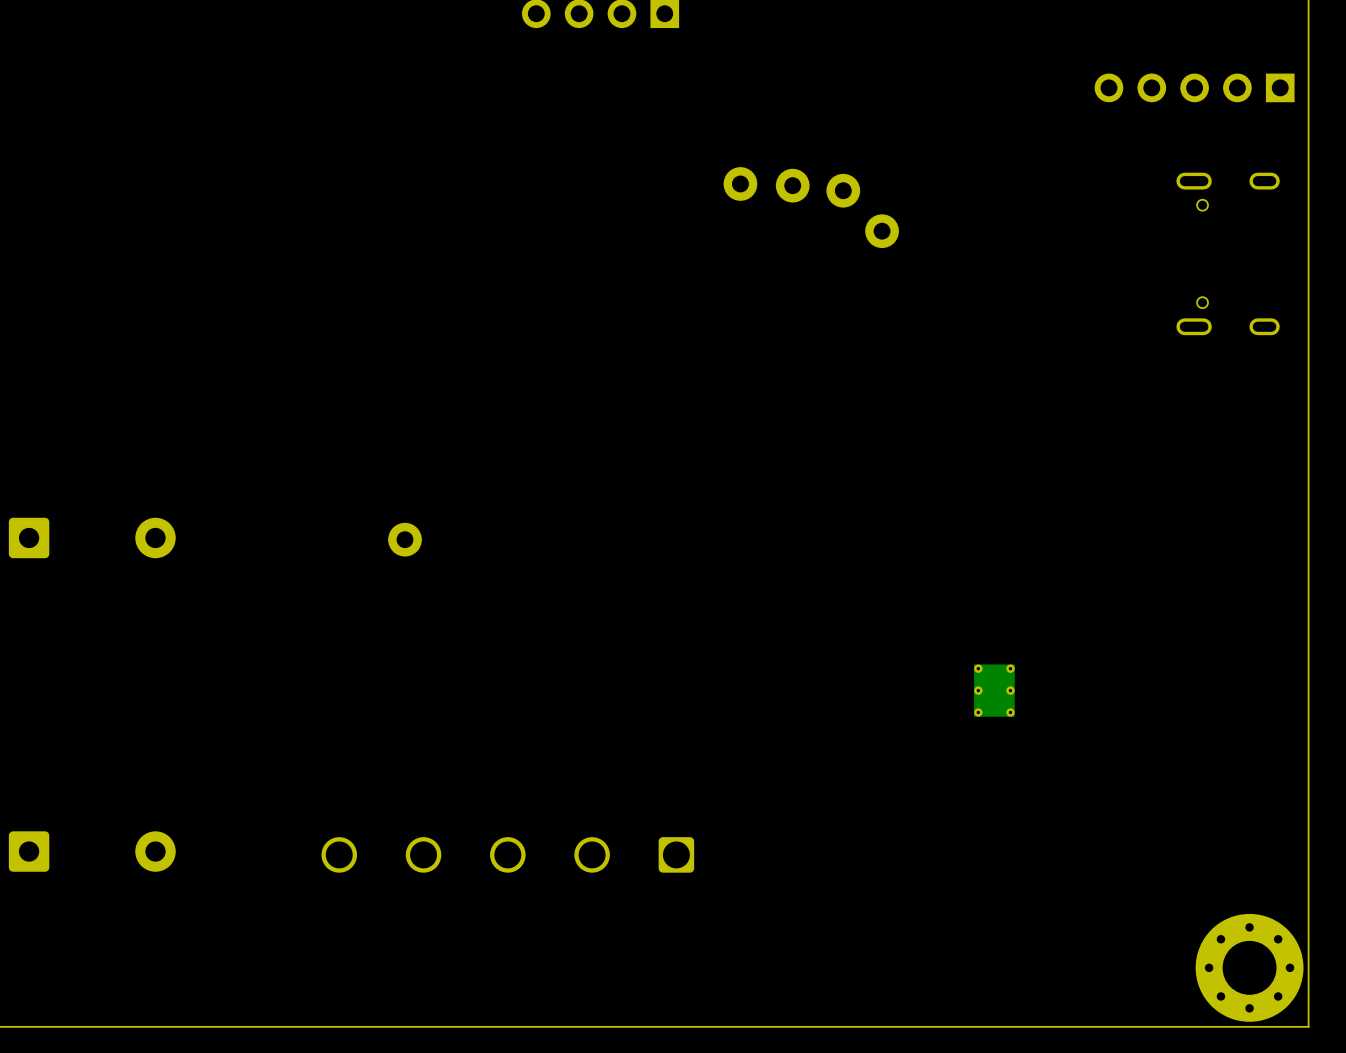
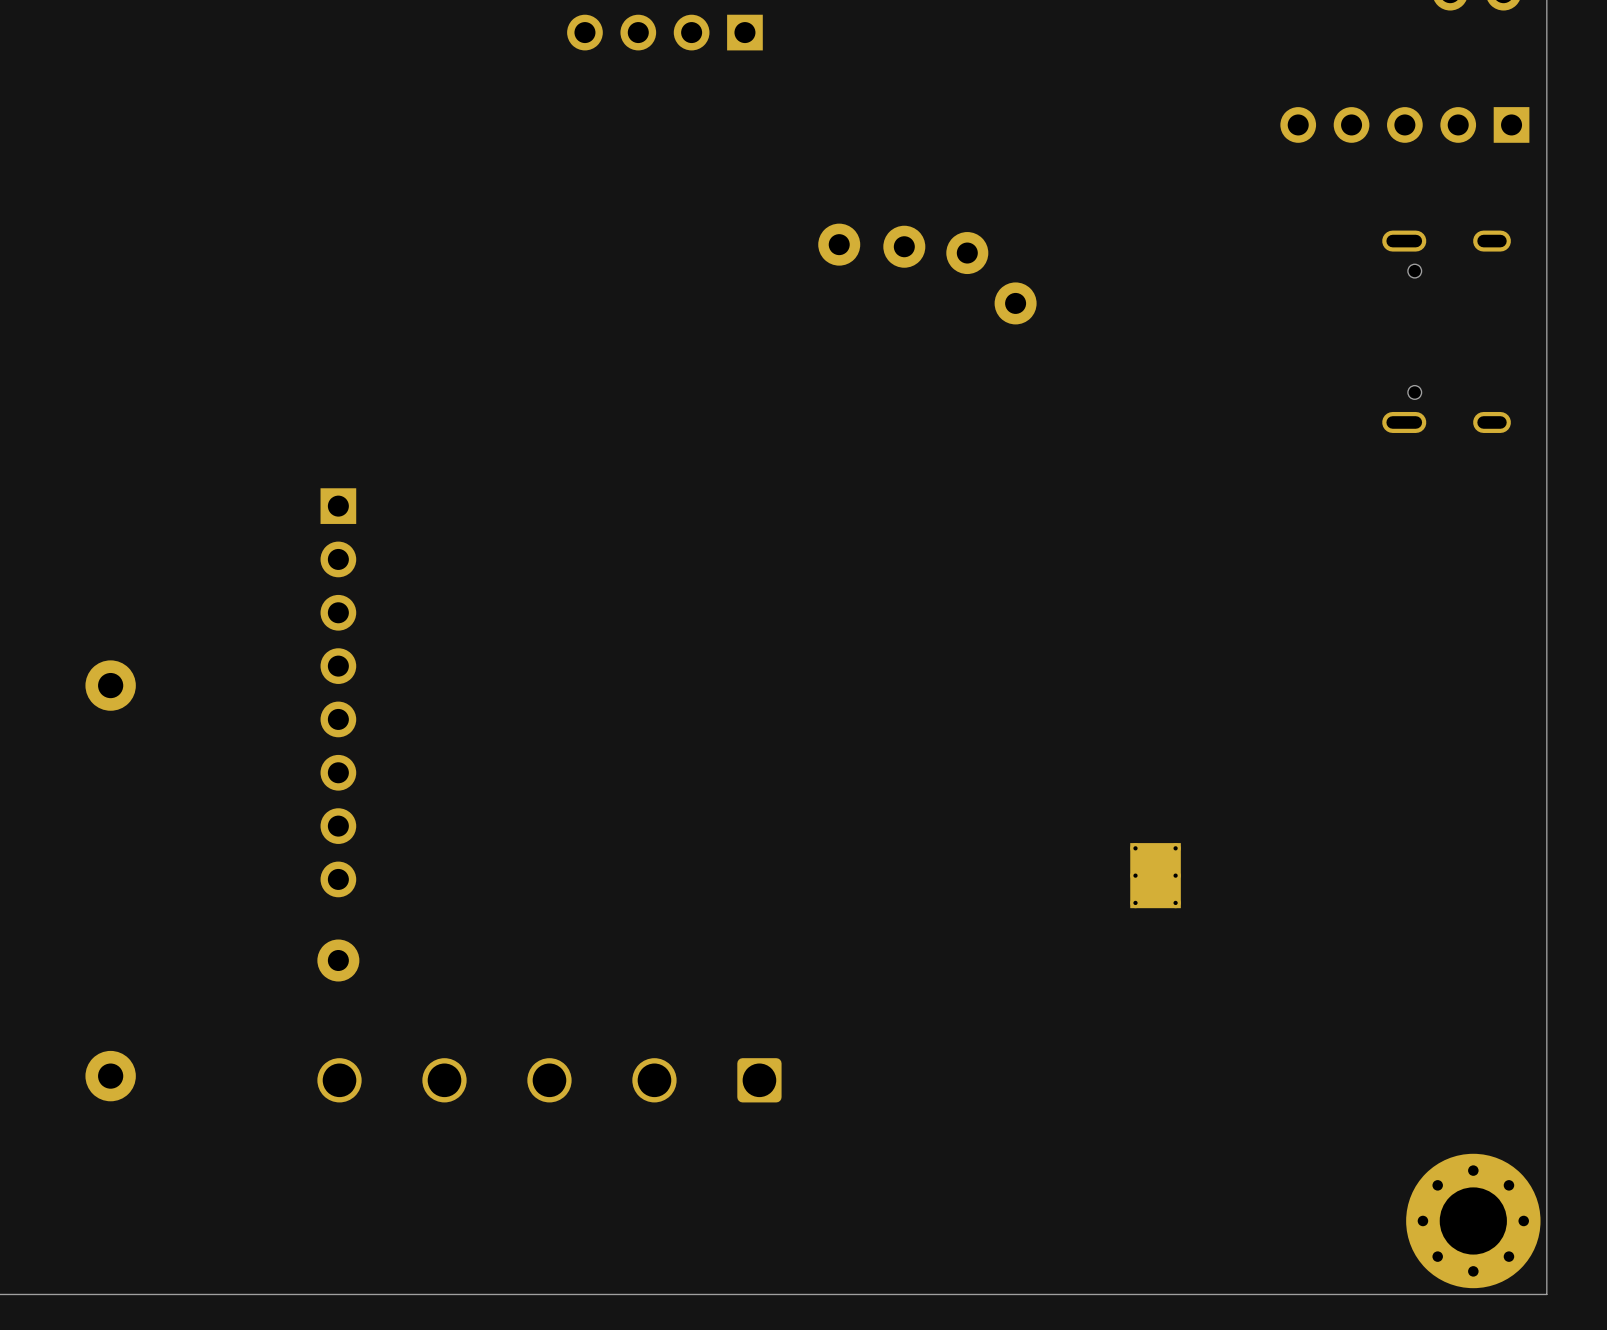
part position: (405, 539) -> (338, 960)
part: none -> (338, 692)

